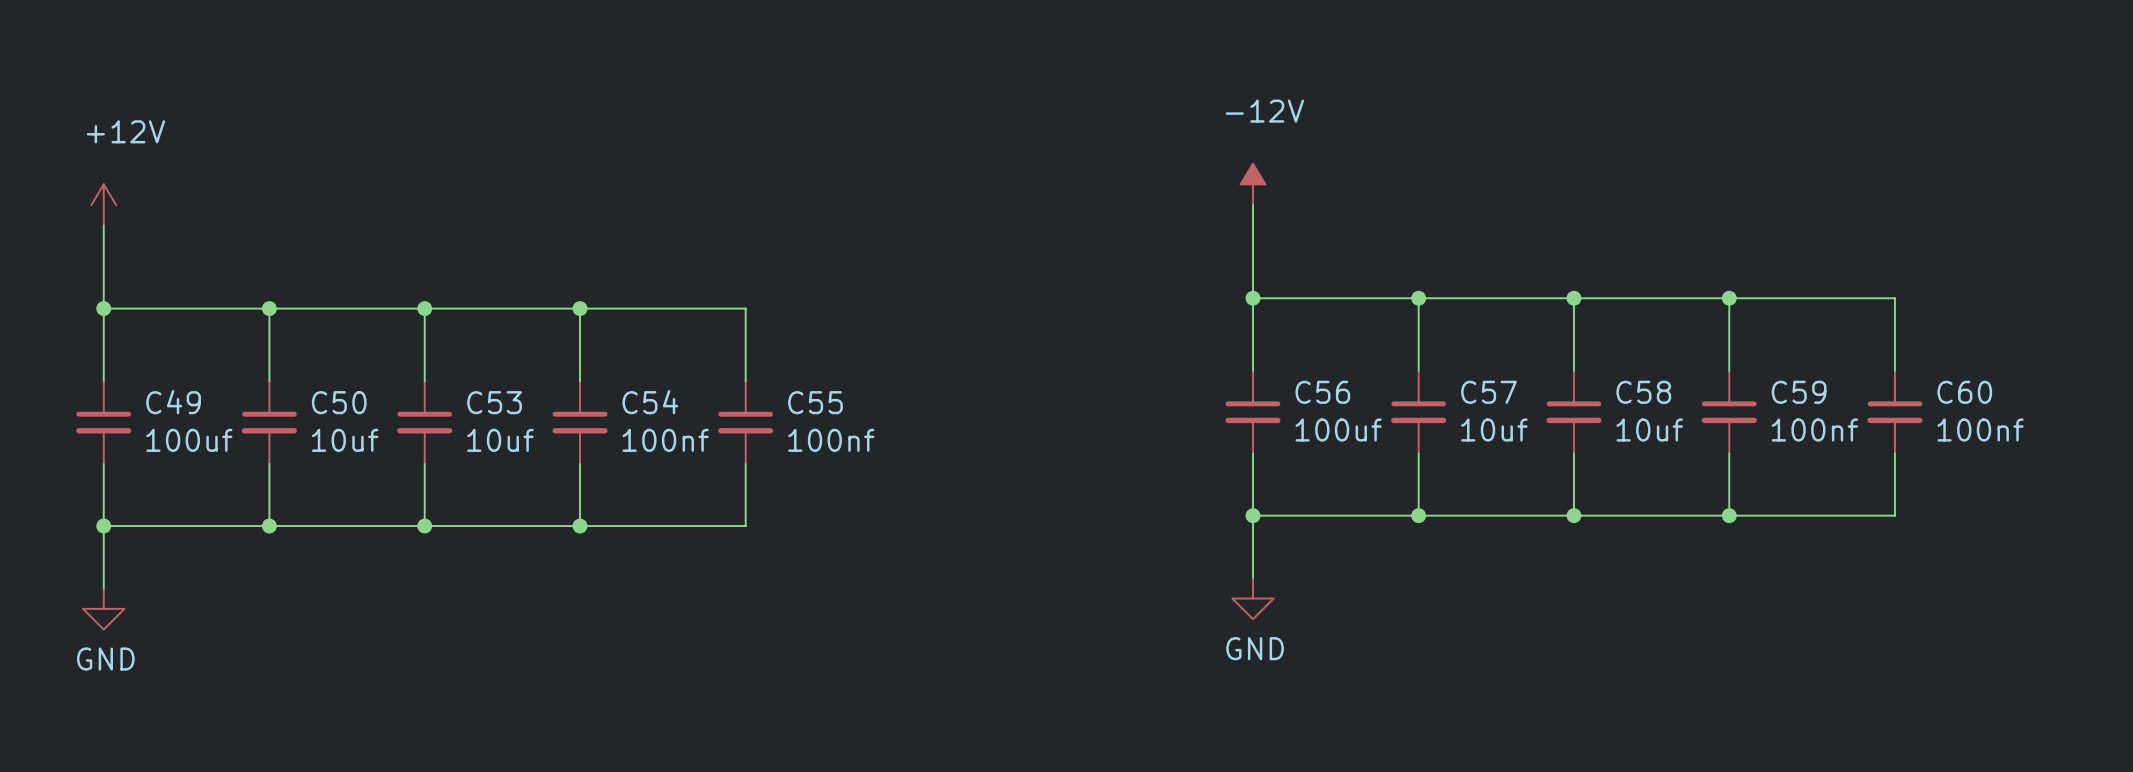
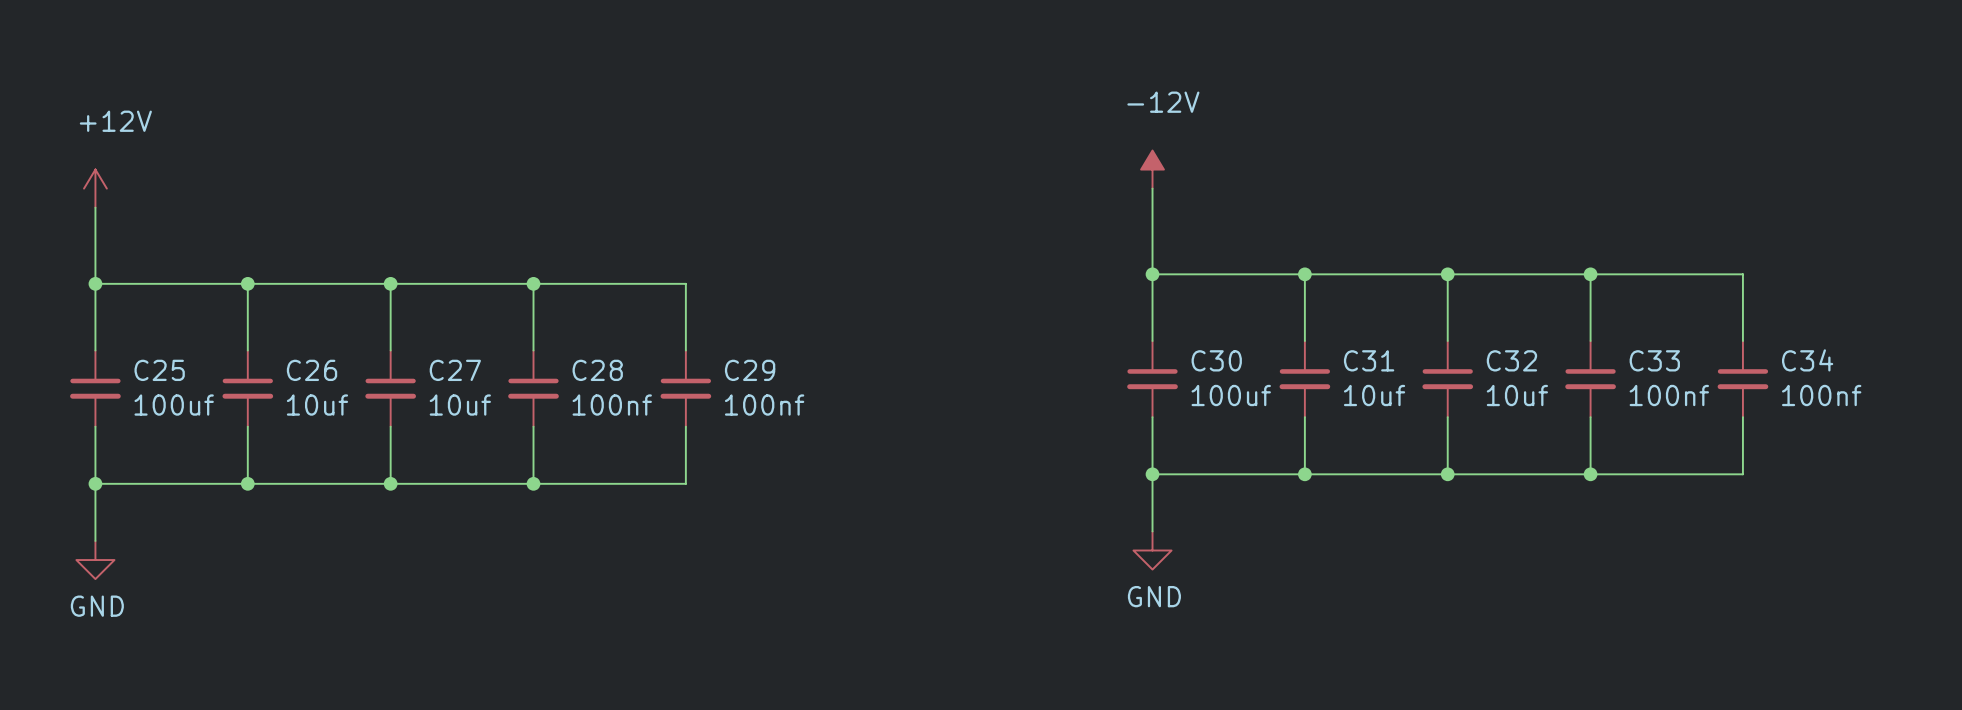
C56 name: C56 (1322, 392) -> C30 (1216, 360)
C57 name: C57 (1488, 392) -> C31 (1369, 360)
C58 name: C58 (1643, 392) -> C32 (1511, 360)
C59 name: C59 (1799, 392) -> C33 (1654, 360)
C60 name: C60 (1964, 392) -> C34 (1807, 360)
C49 name: C49 (173, 402) -> C25 (159, 370)
C50 name: C50 (339, 402) -> C26 (312, 370)
C53 name: C53 (494, 402) -> C27 (455, 370)
C54 name: C54 (650, 402) -> C28 (597, 370)
C55 name: C55 (815, 402) -> C29 (750, 370)

